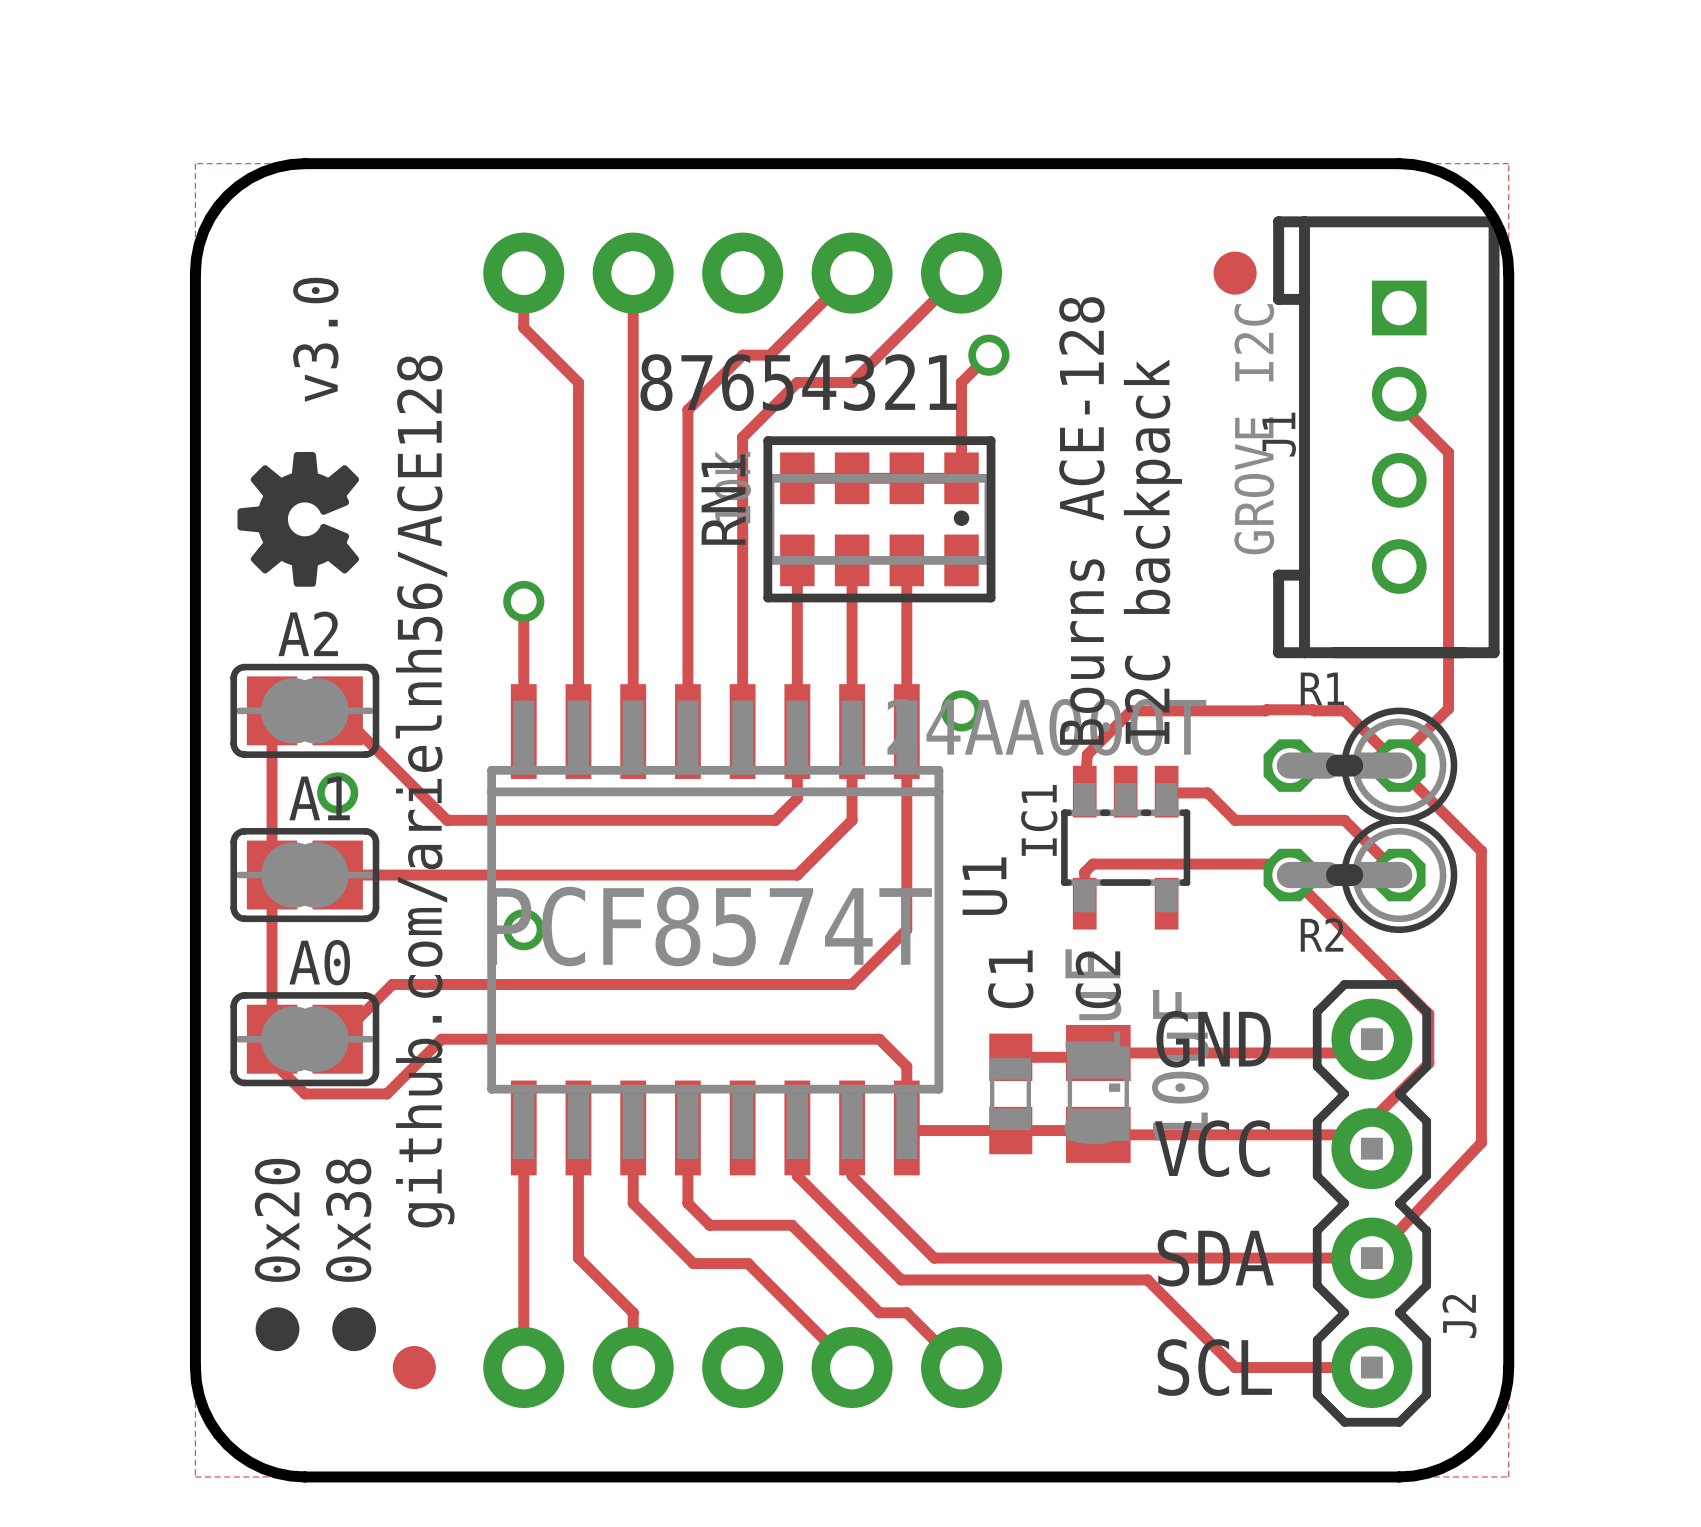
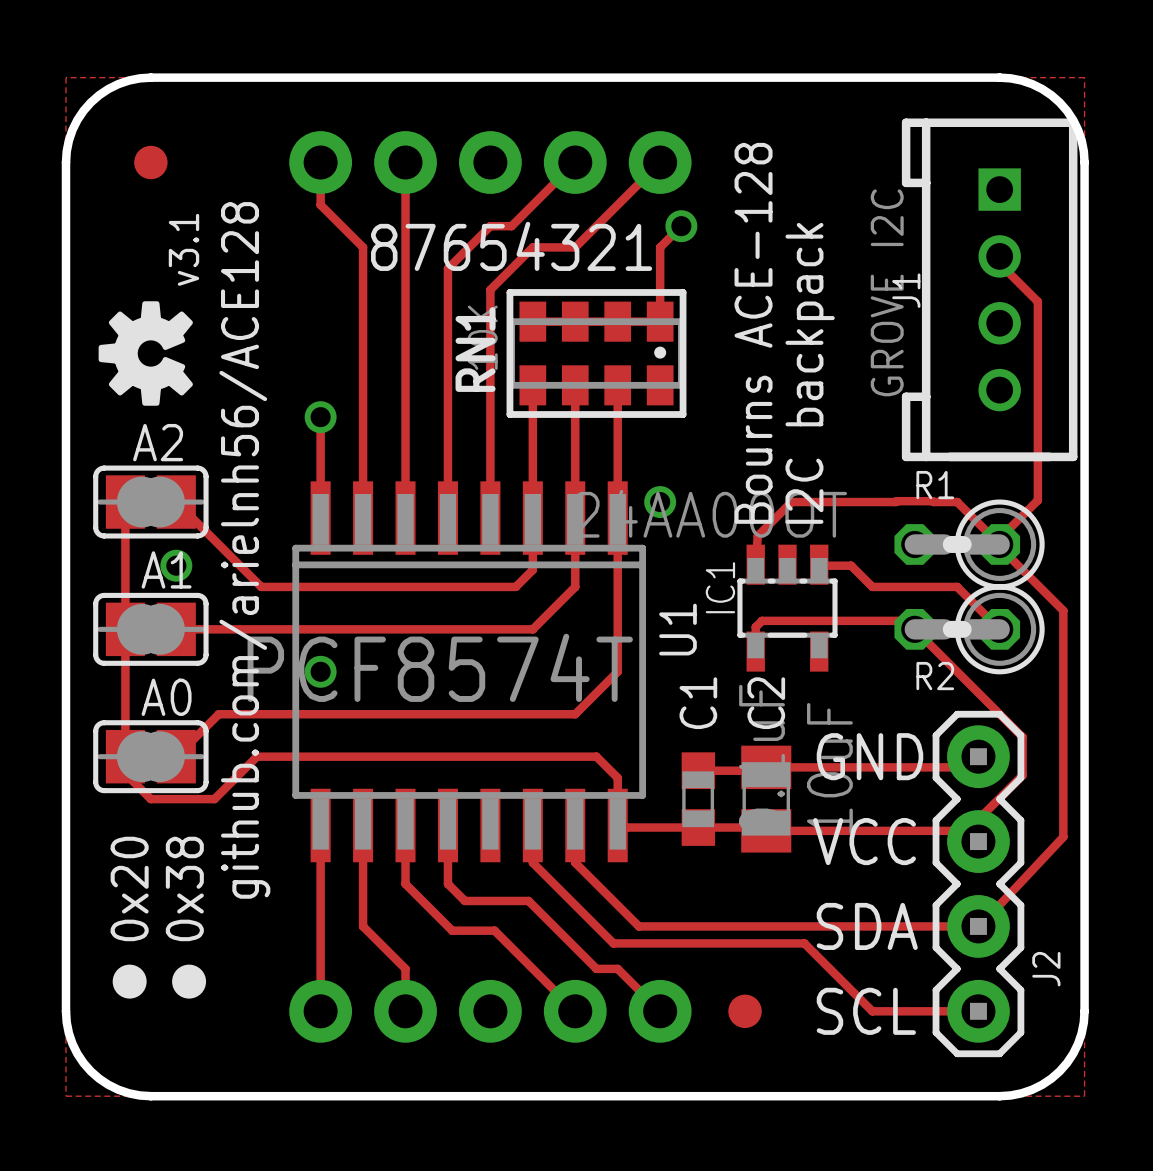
part: none -> (150, 162)
part: (1235, 273) -> none
text: v3.0 (315, 339) -> v3.1 (183, 249)
part: (414, 1367) -> none
part: none -> (745, 1011)

